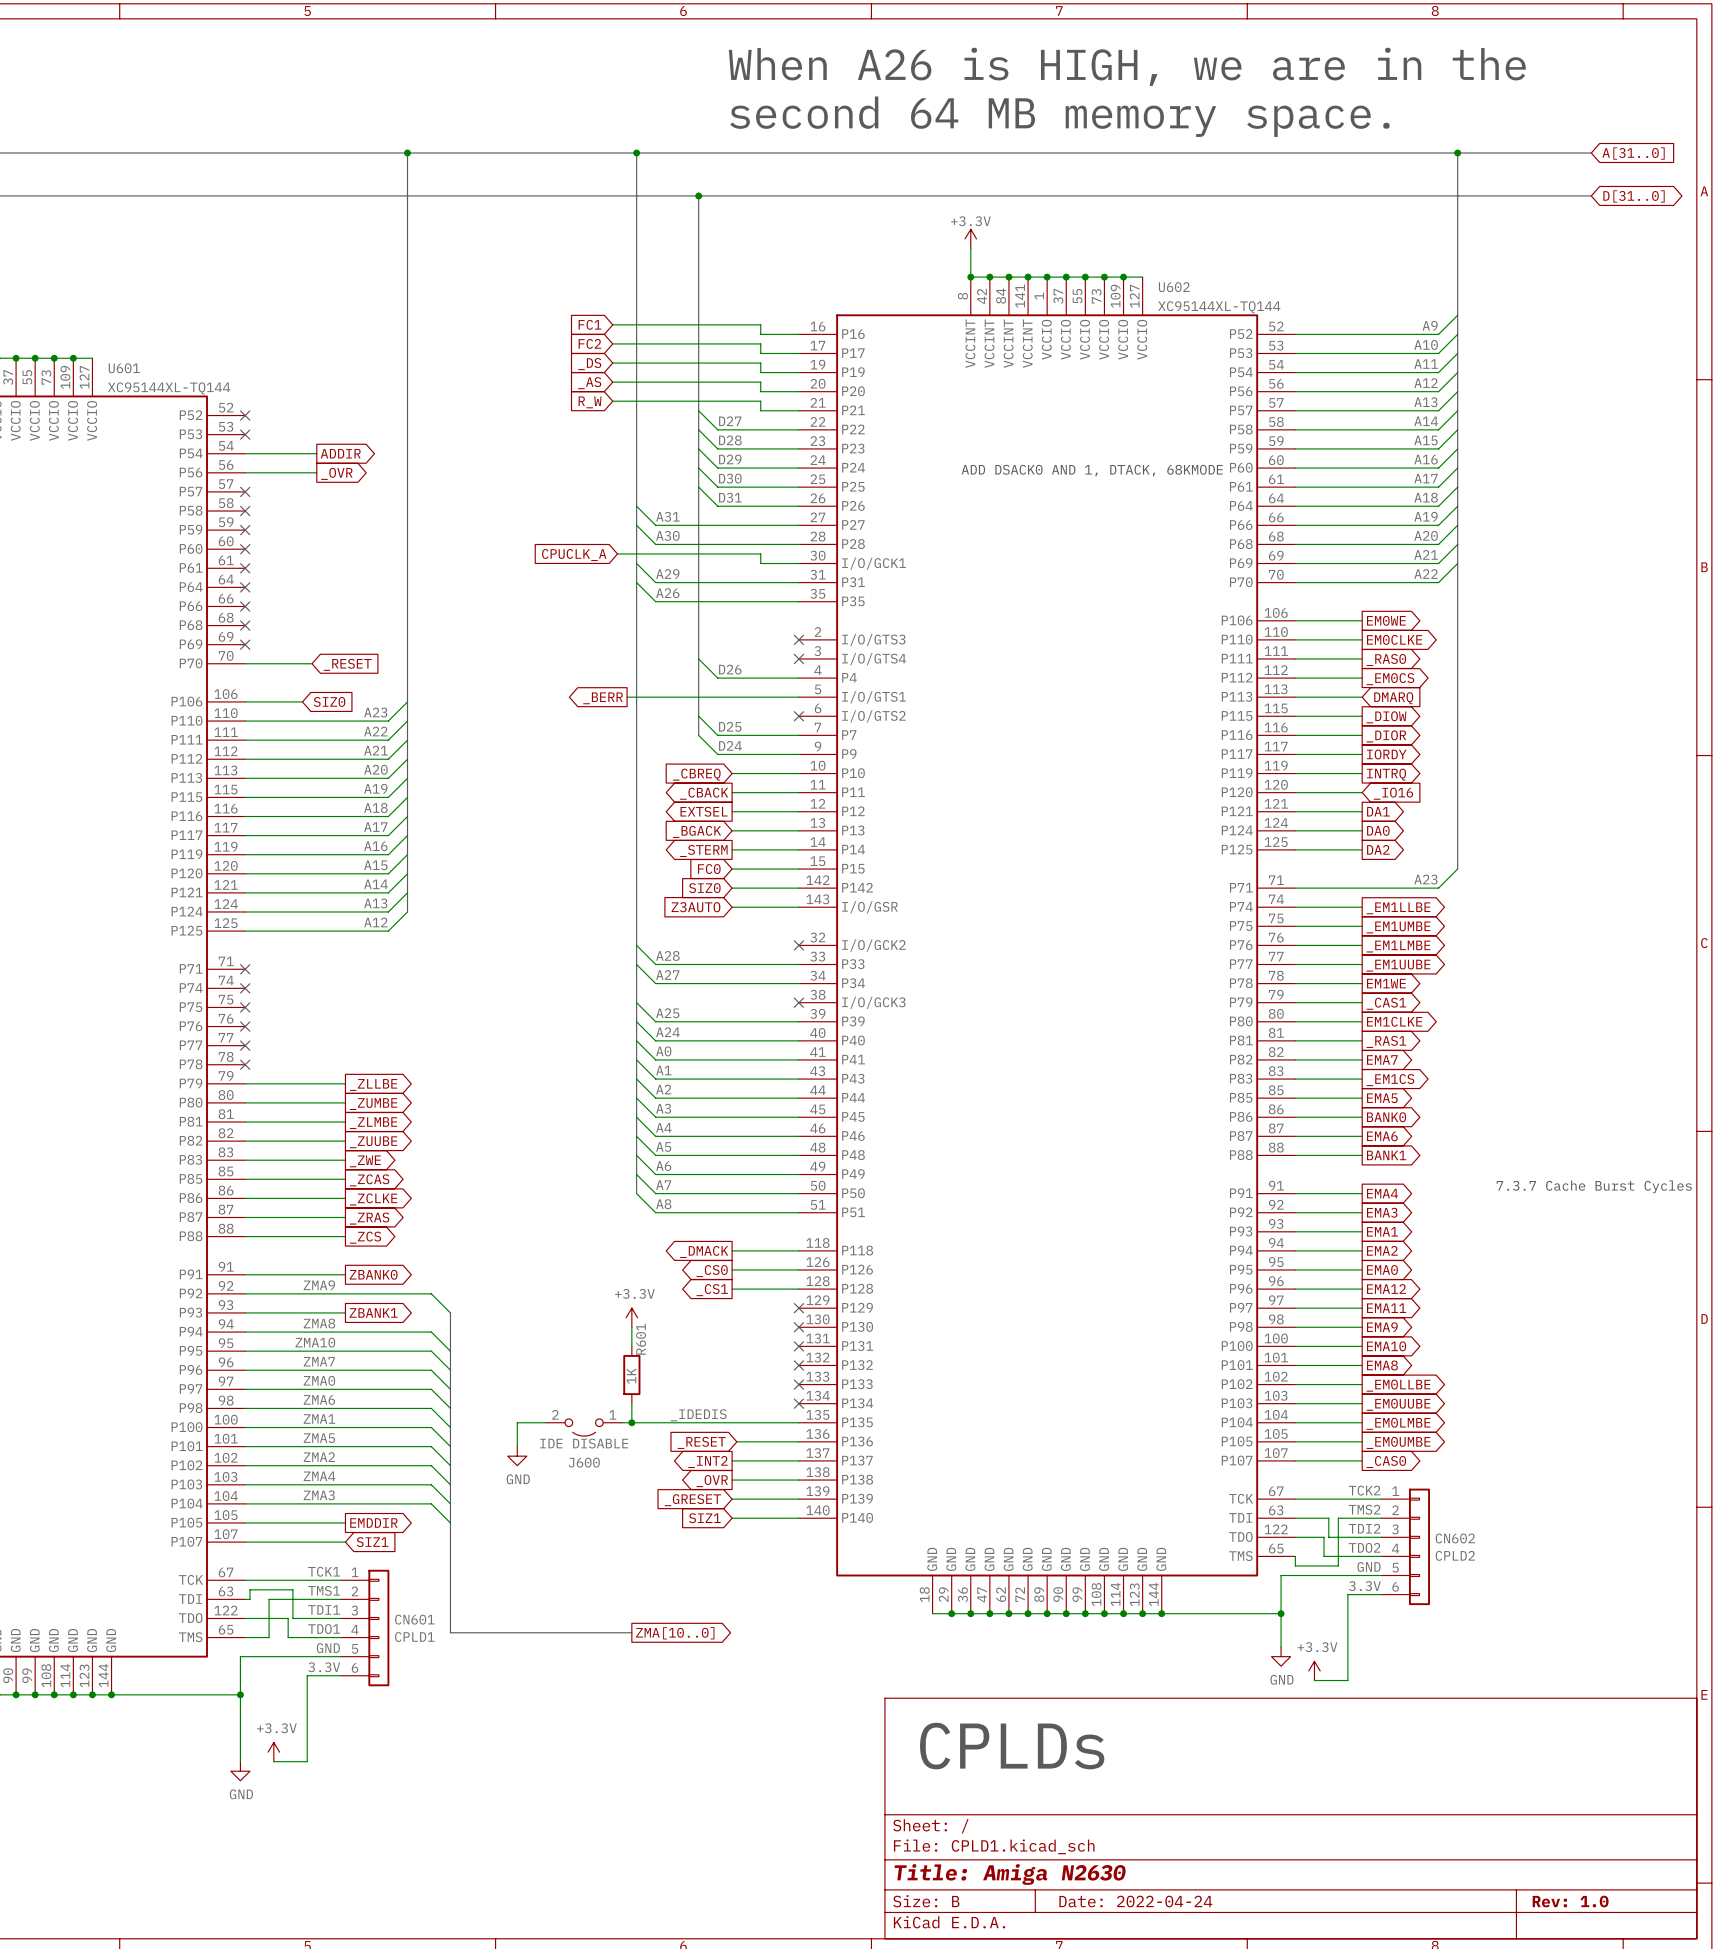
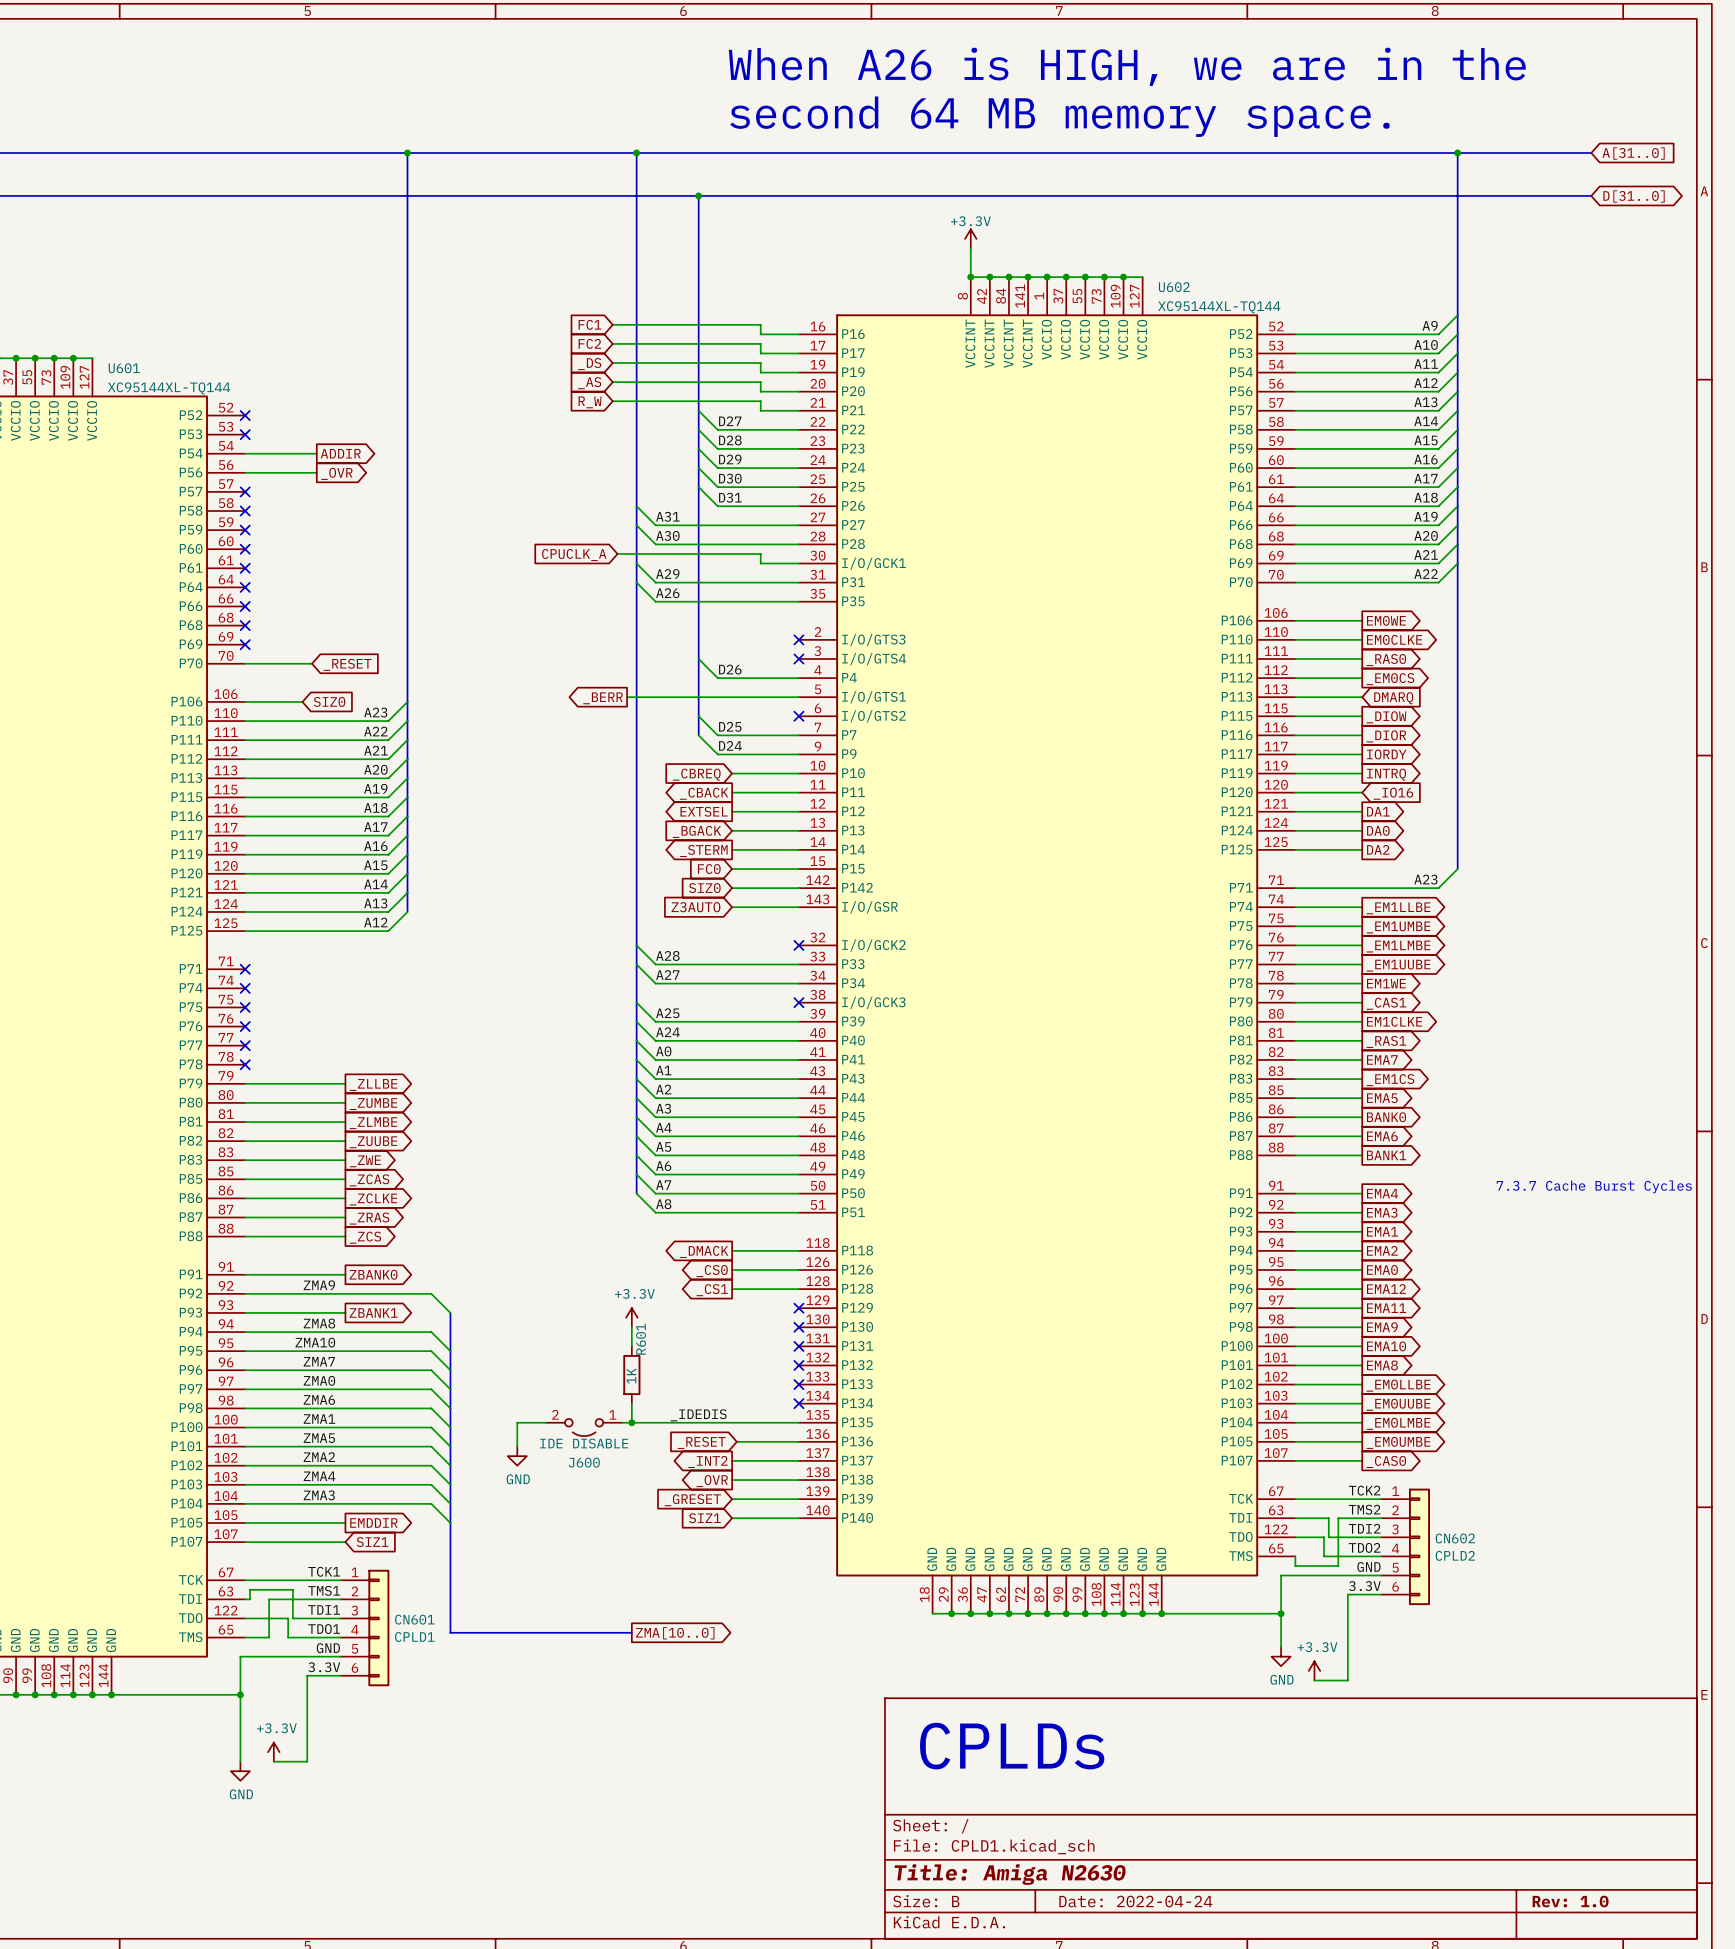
text: ADD DSACK0 AND 1, DTACK, 68KMODE (1092, 470) -> none

